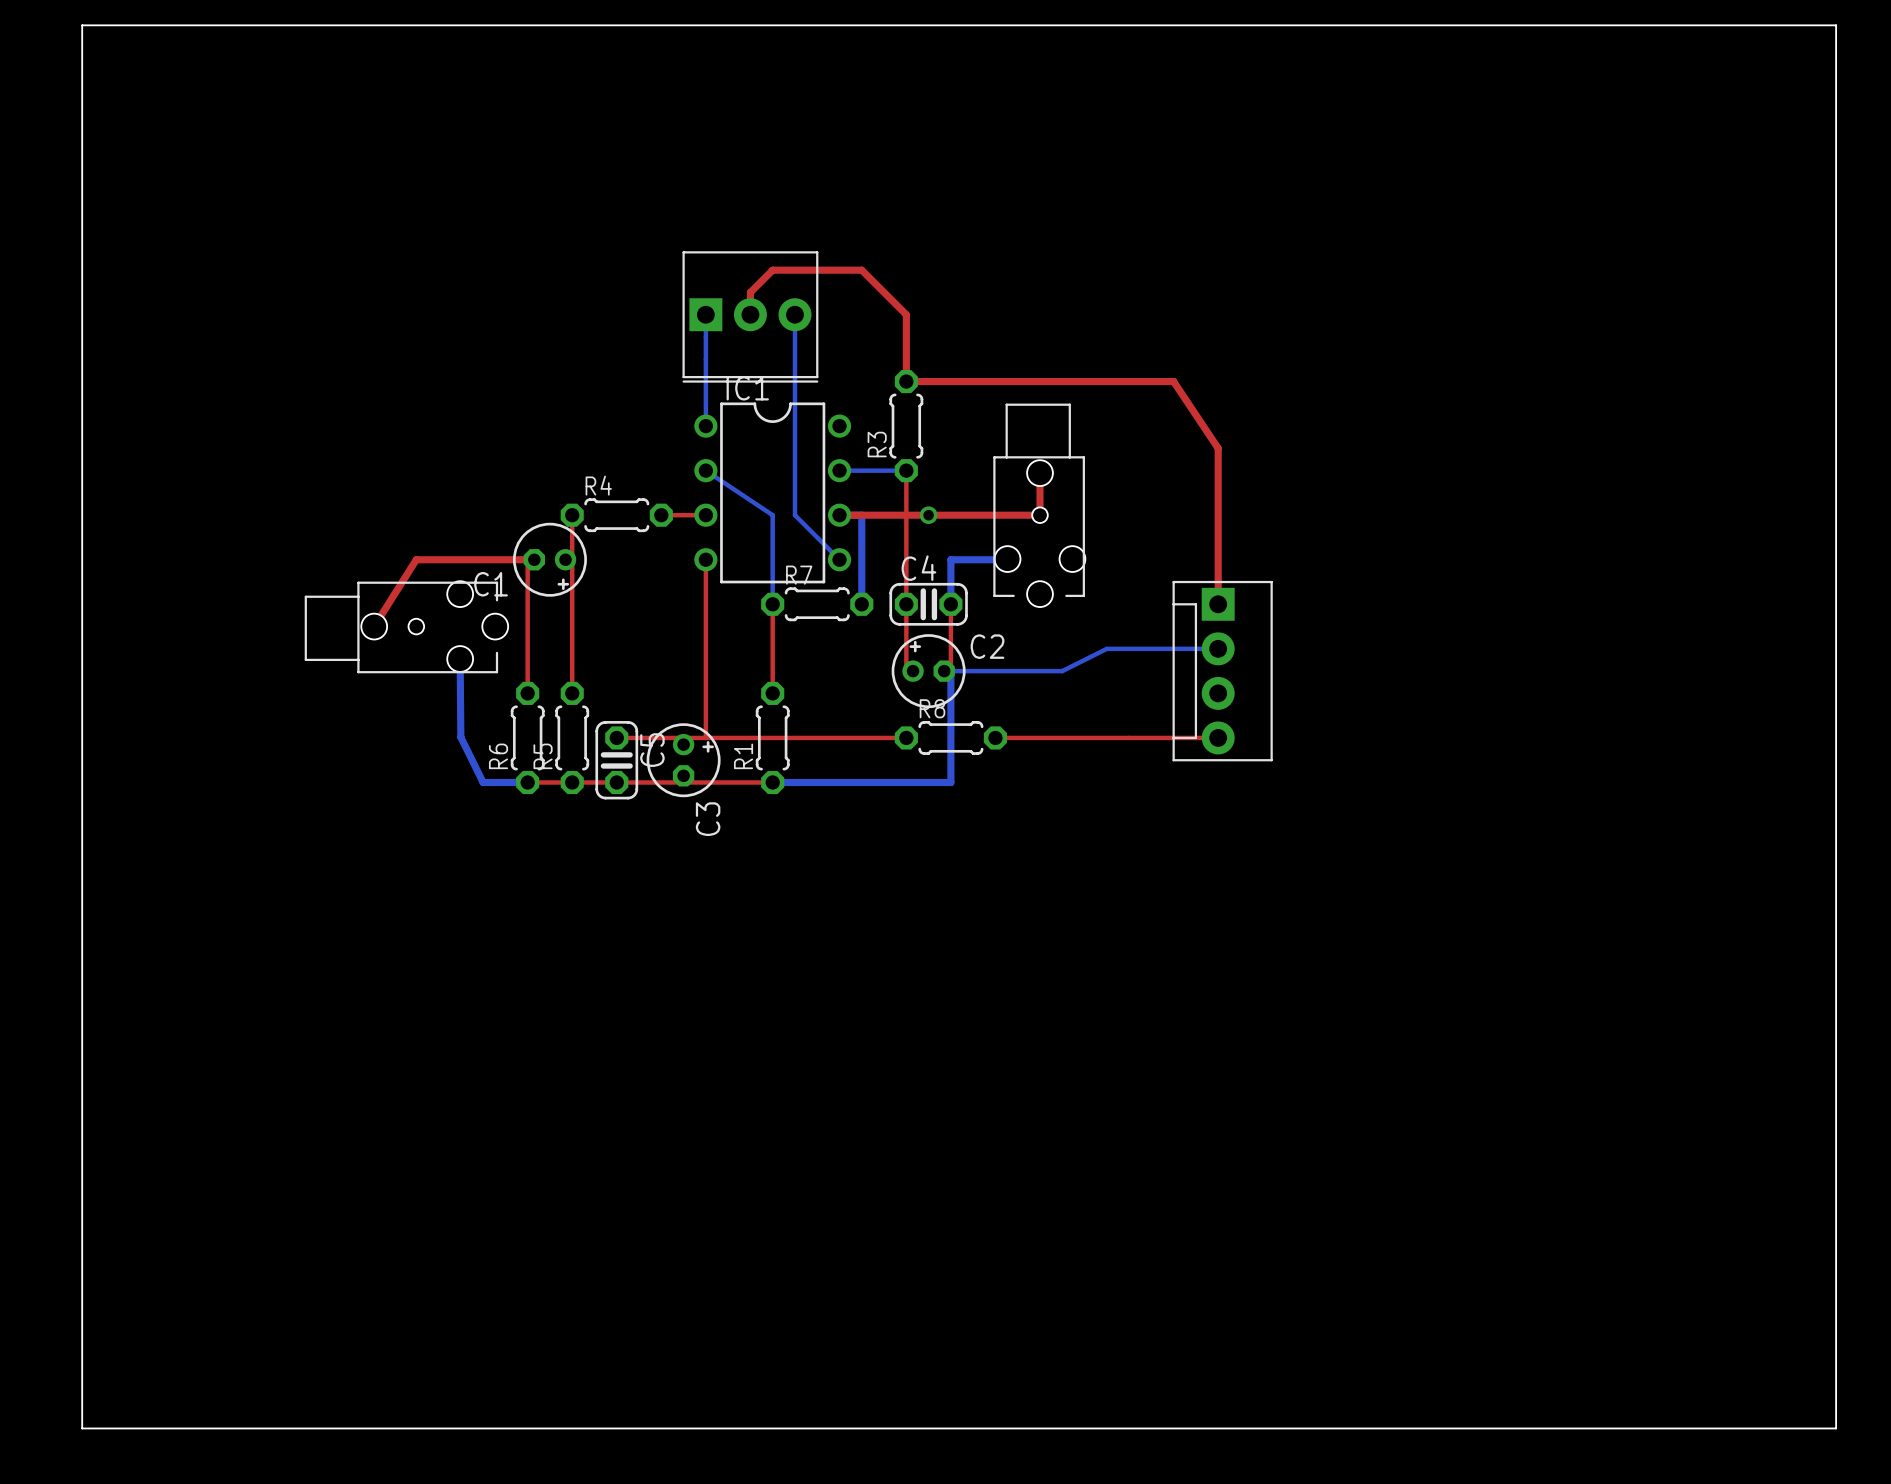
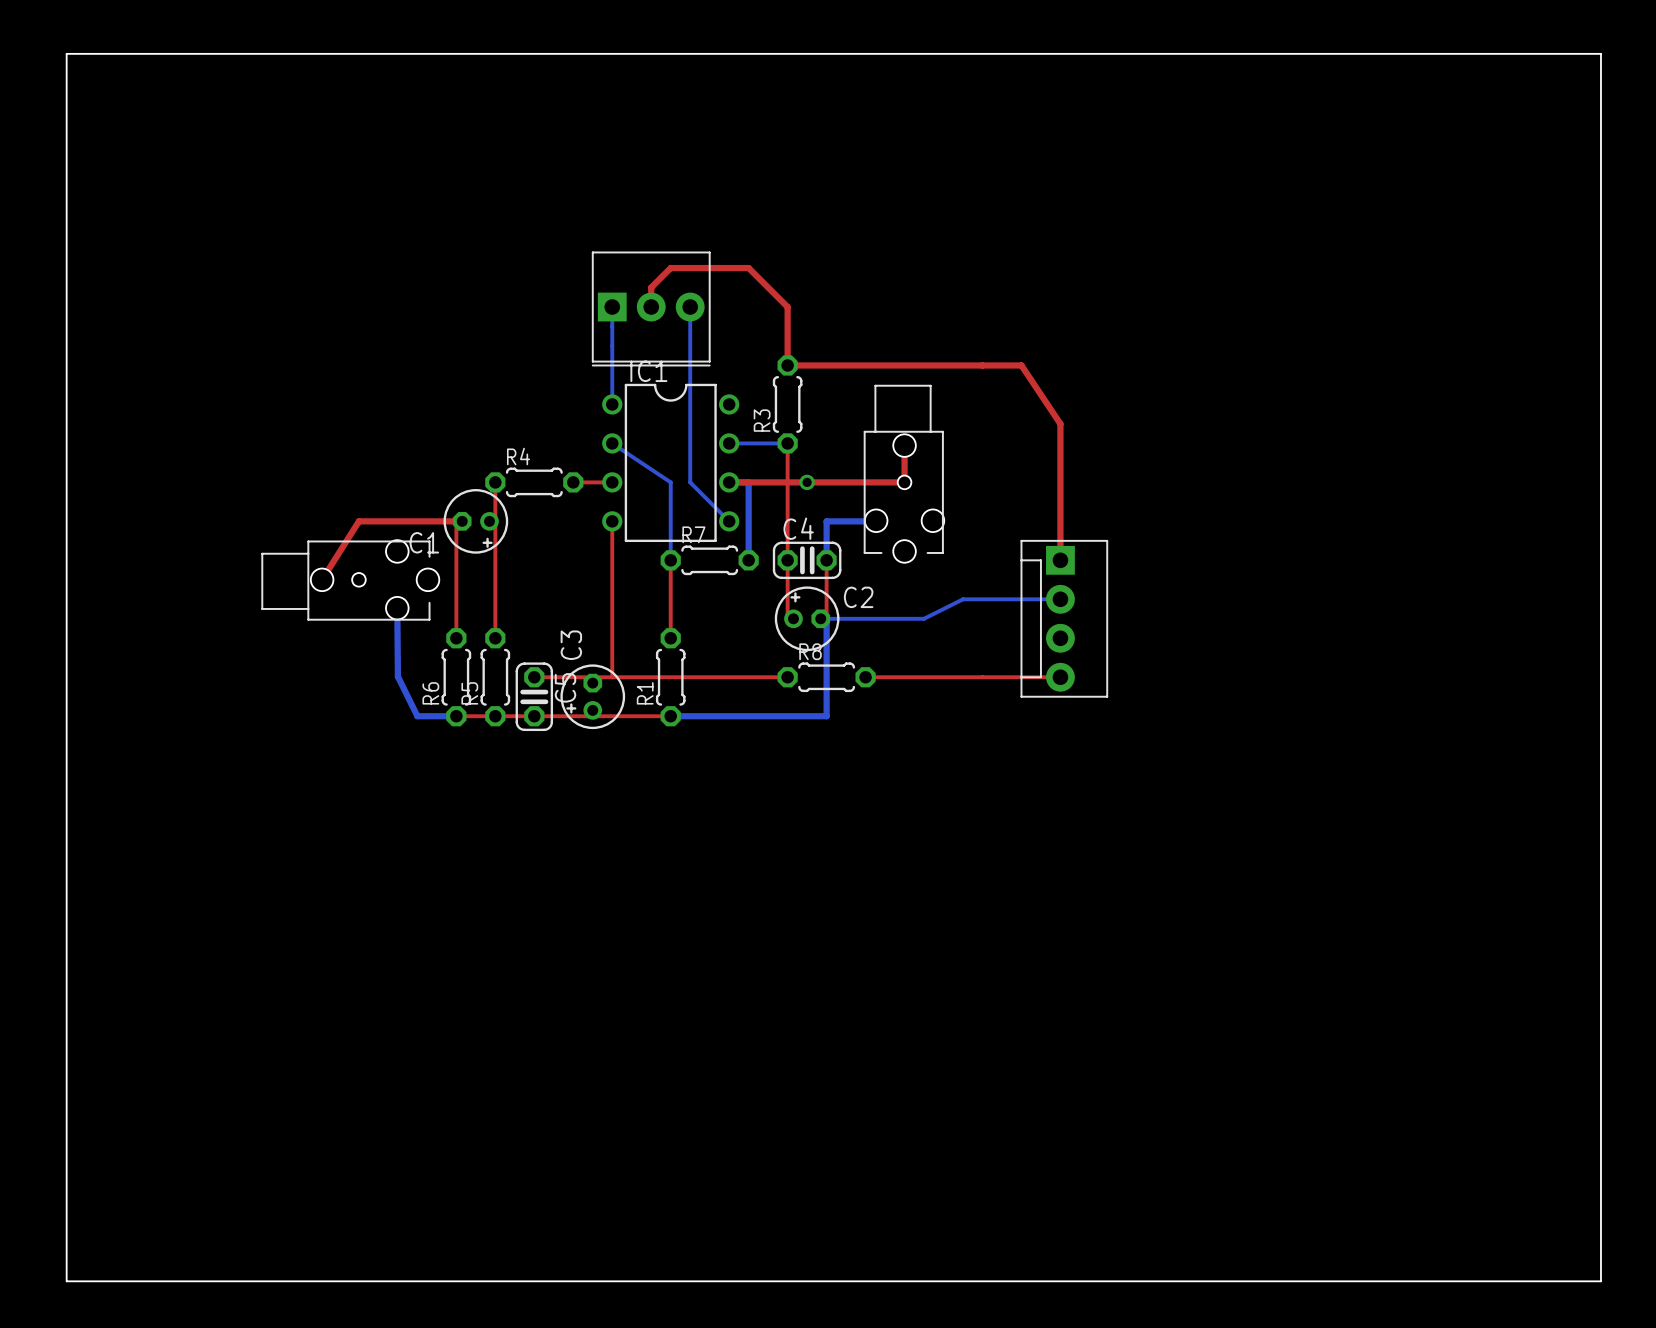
C3 rotation: 0° (683, 760) -> 180° (592, 696)

